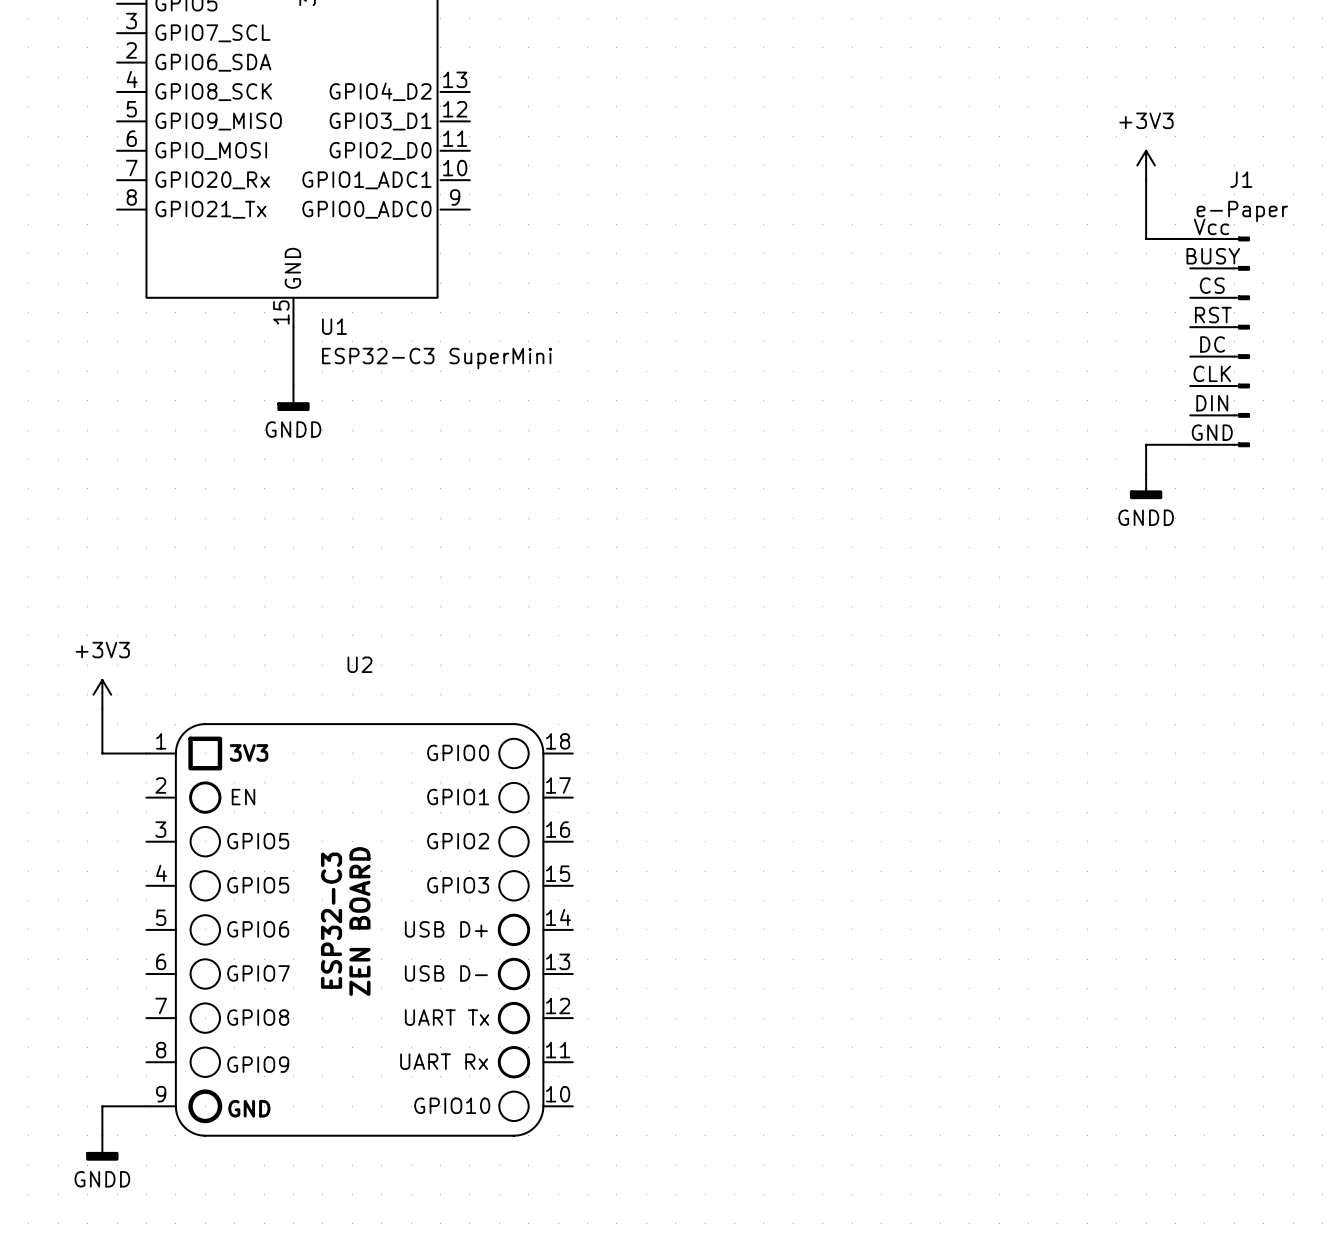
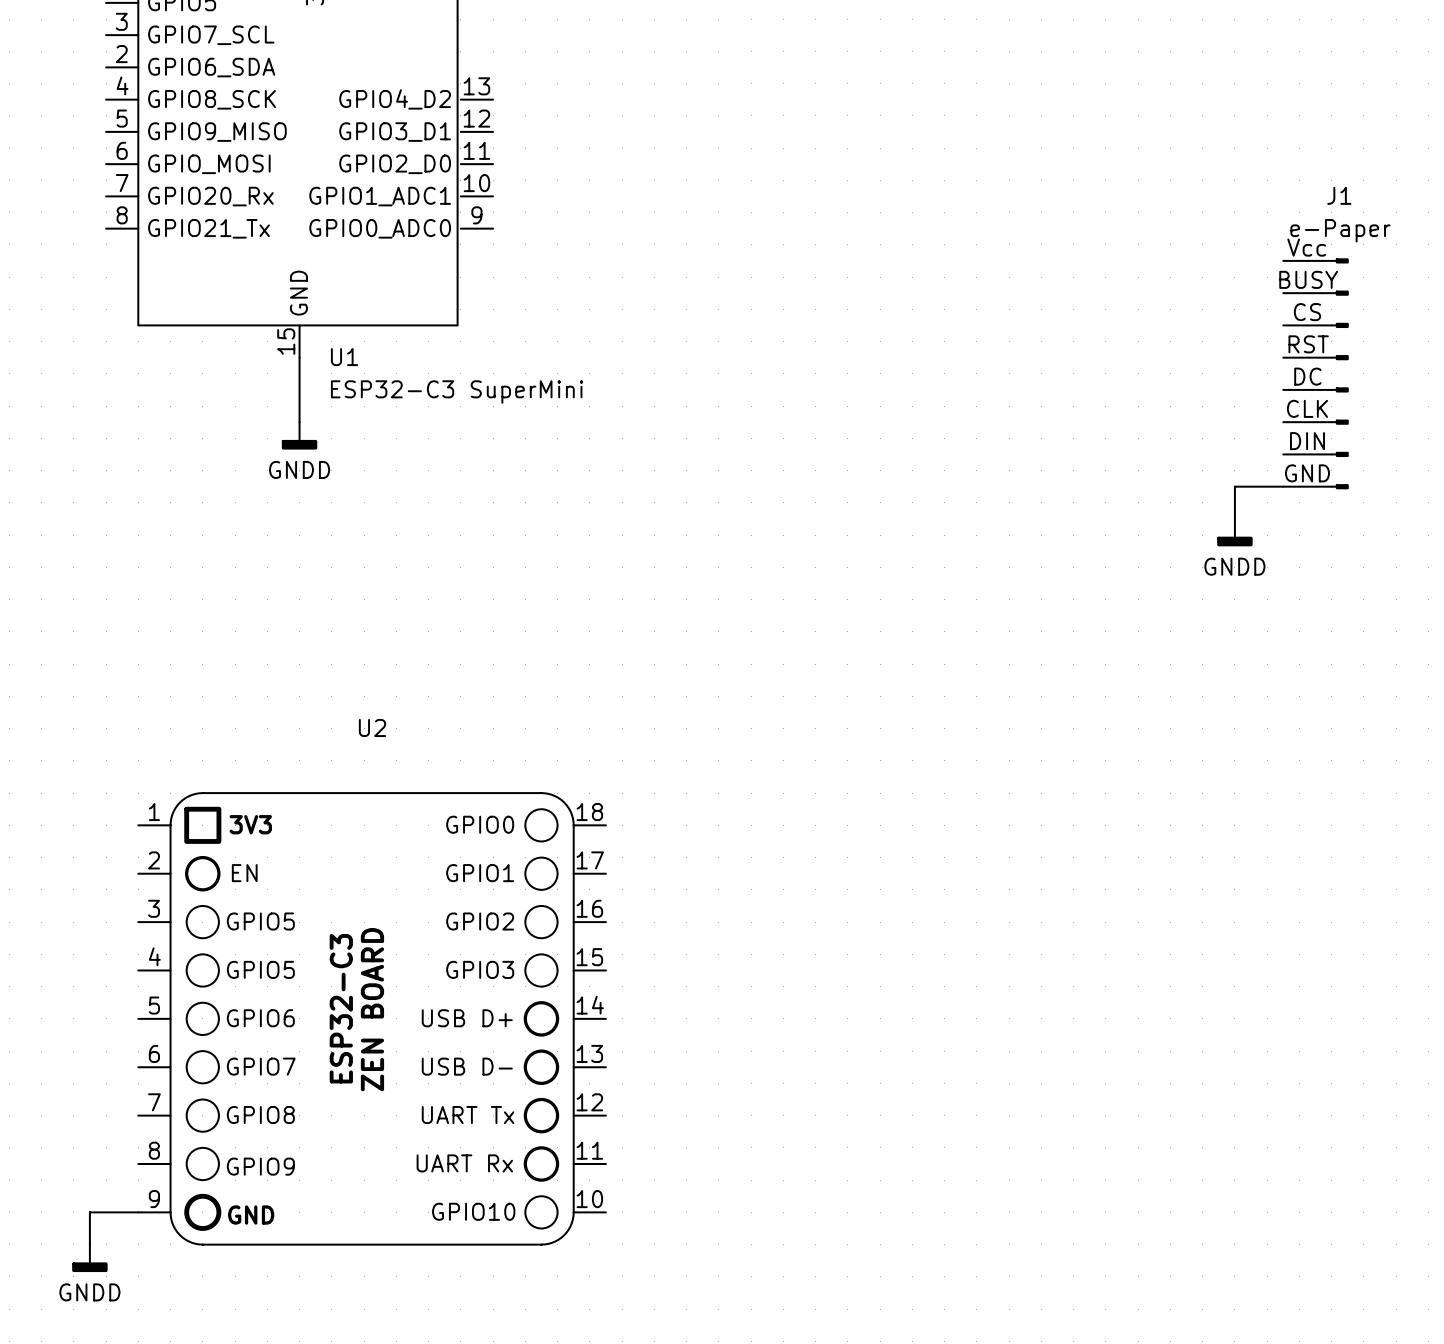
power symbol: +3V3 (1146, 165) -> none
wire: (1146, 180) (1146, 238) (1190, 238) -> none
power symbol: +3V3 (102, 694) -> none
wire: (102, 709) (102, 753) (146, 753) -> none

